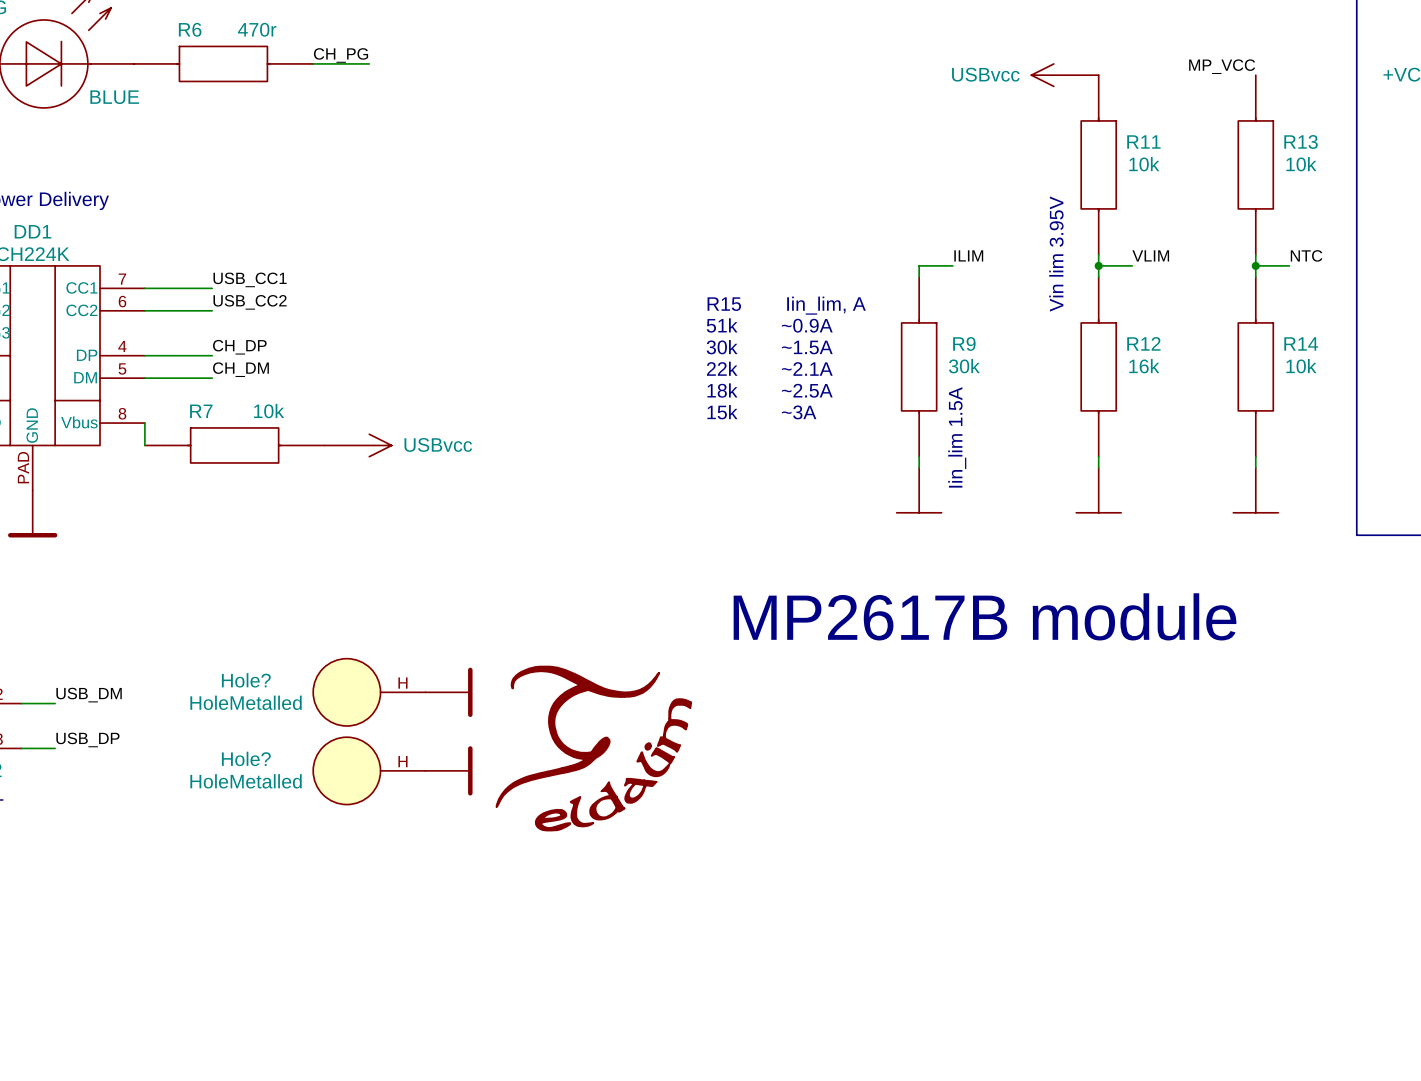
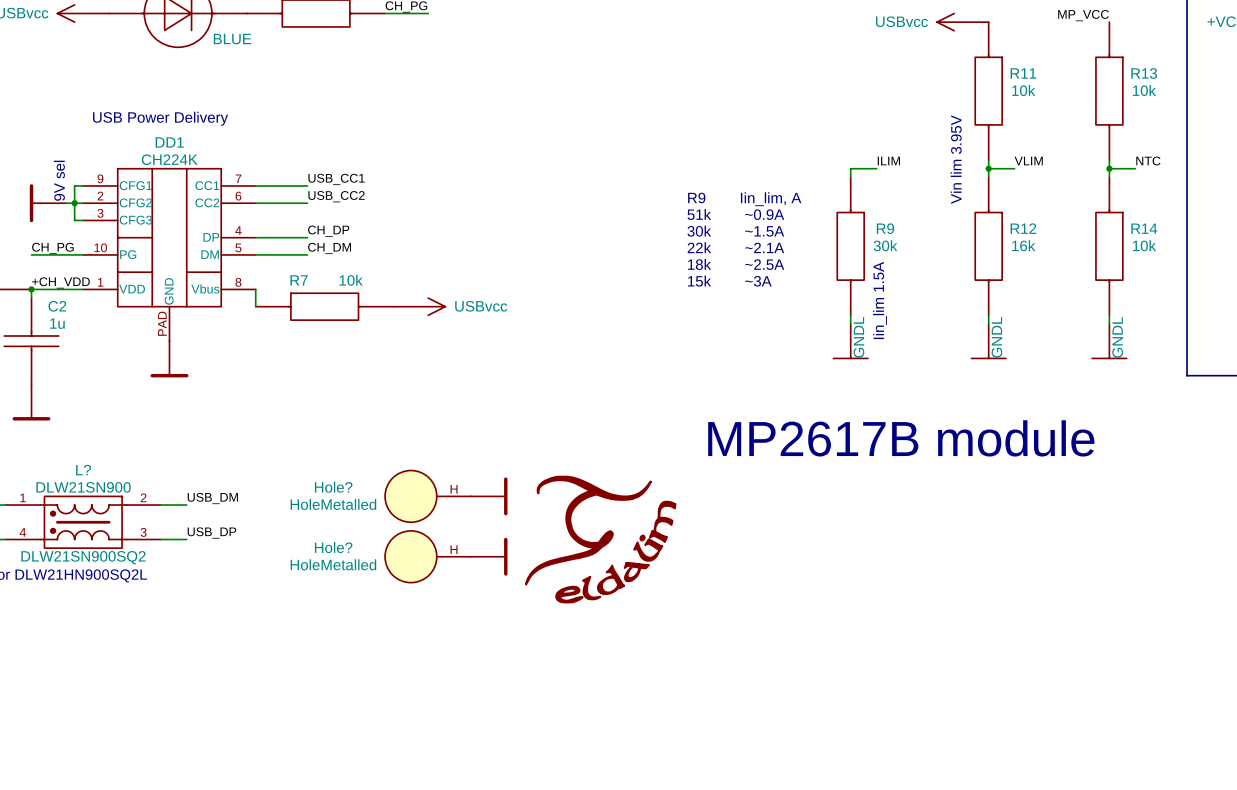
text: R15 Iin_lim, A (786, 305) -> R9 Iin_lim, A (744, 199)
power symbol text: none -> GNDL (858, 337)
power symbol text: none -> GNDL (996, 337)
power symbol text: none -> GNDL (1117, 337)

